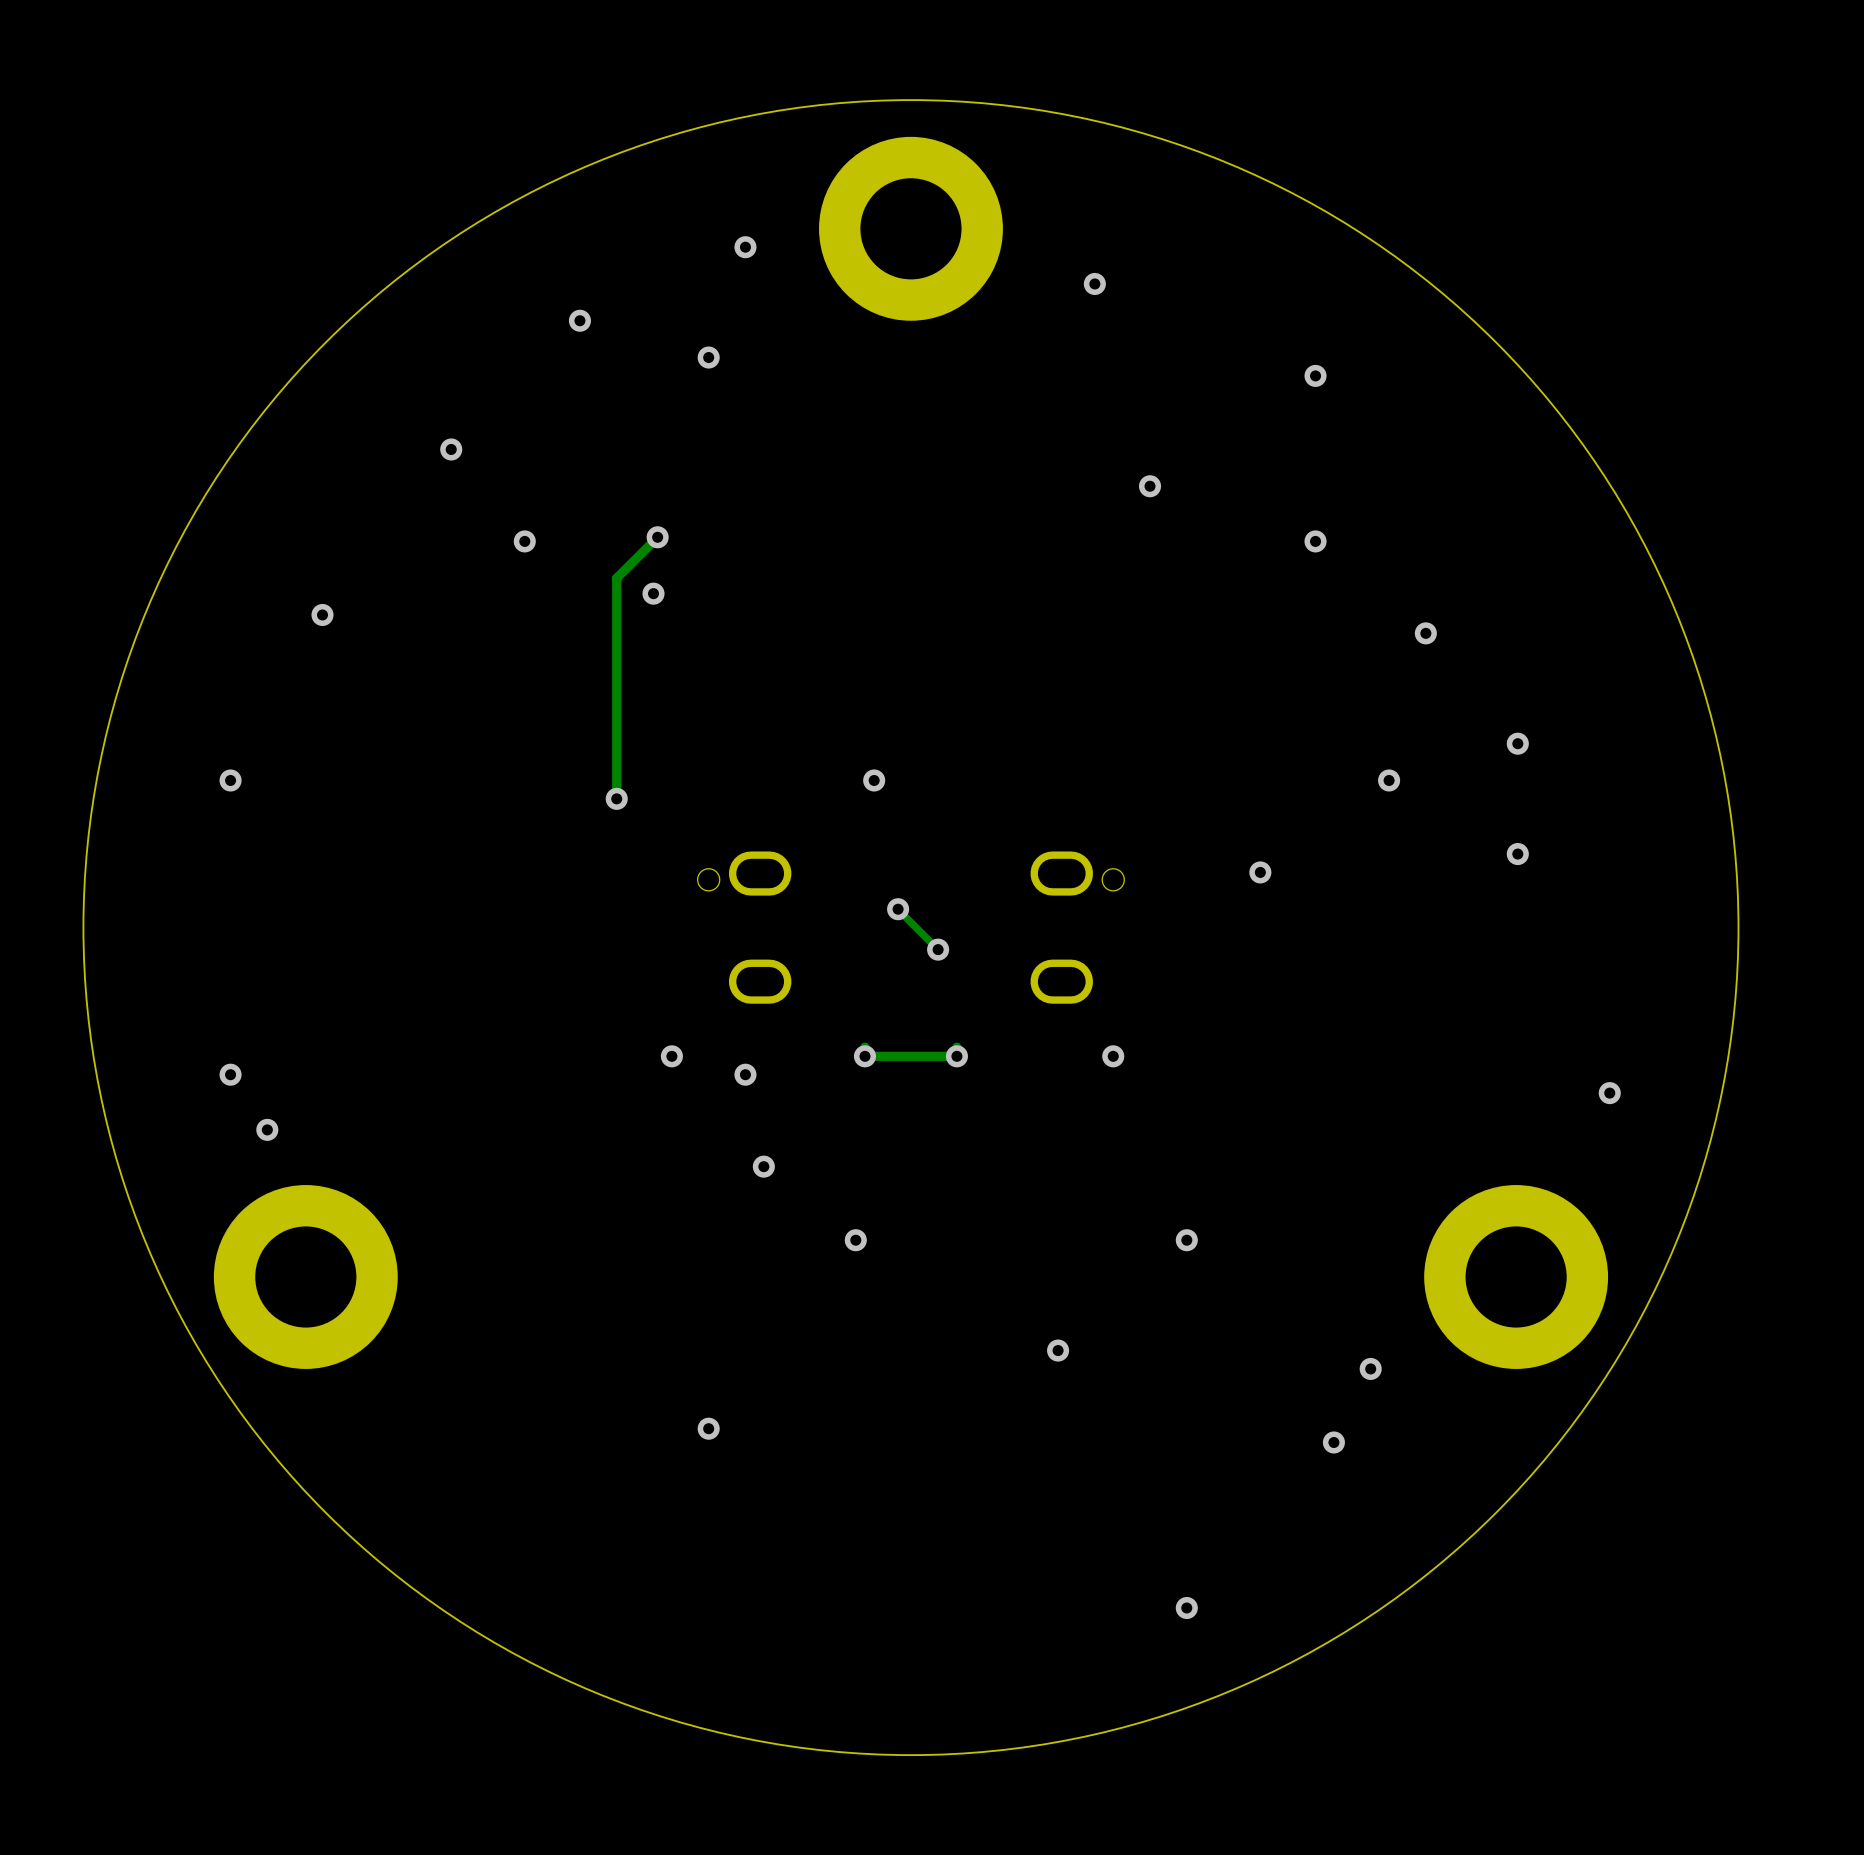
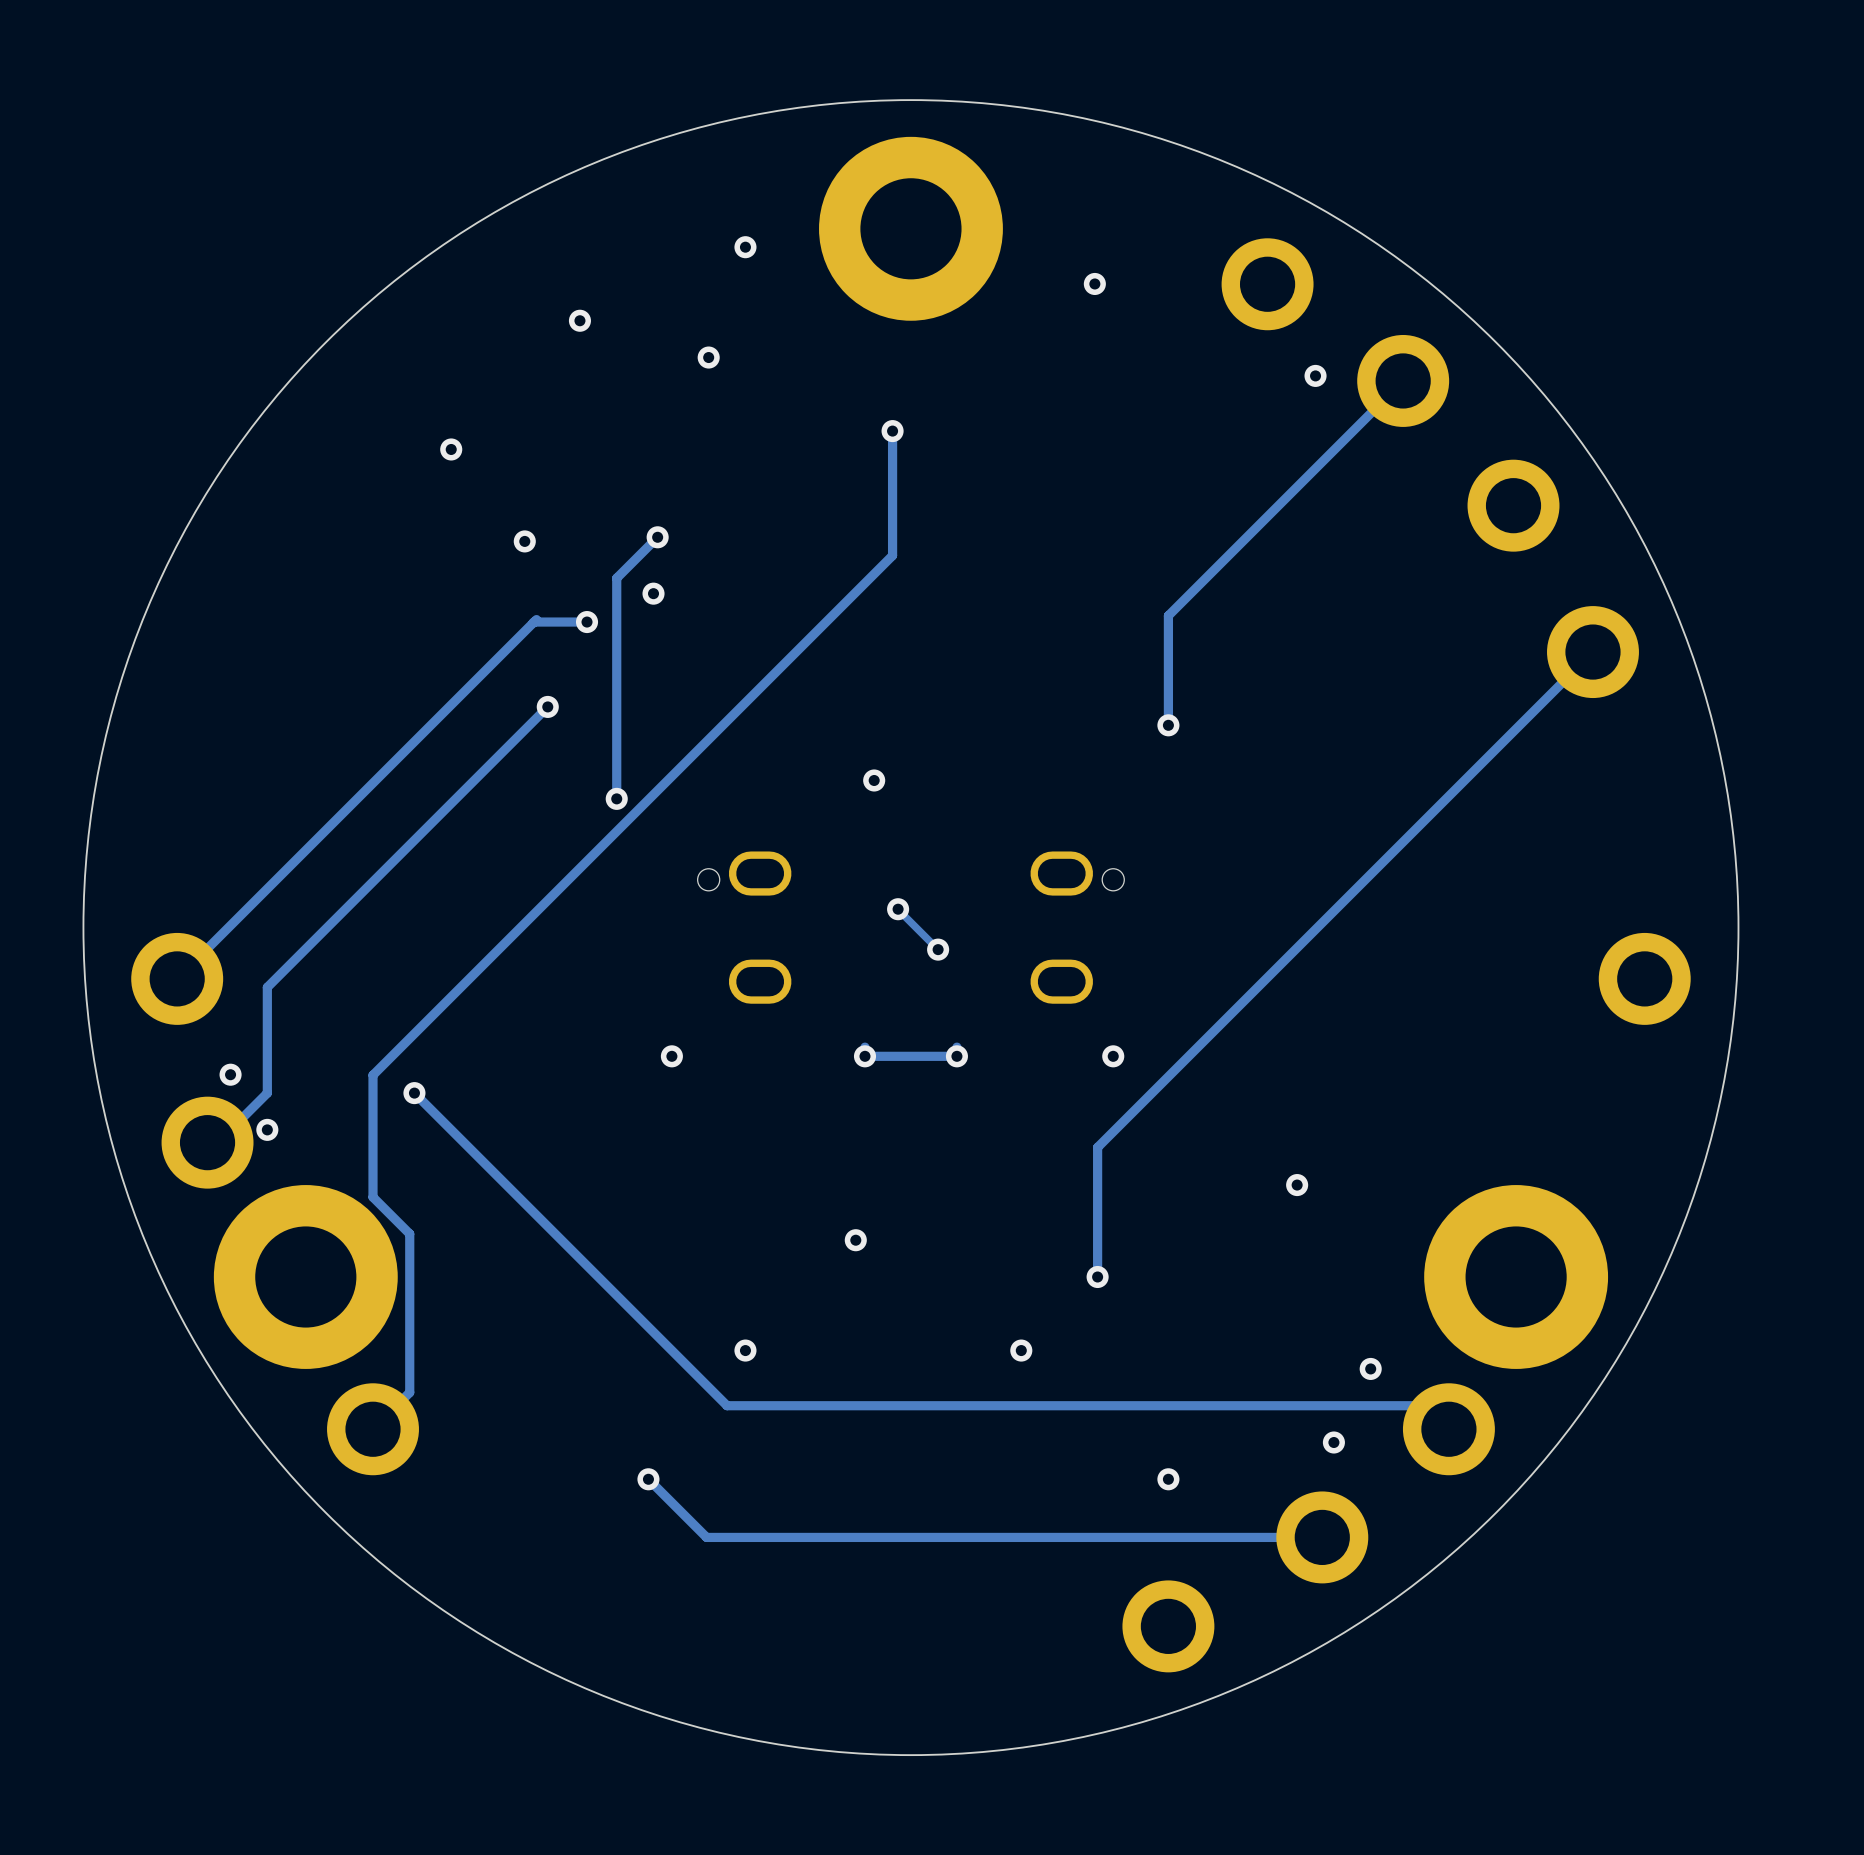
part: none -> (1267, 284)
track: none -> (1403, 380) (1168, 615) (1168, 725)
part: none -> (1403, 380)
track: none -> (892, 431) (892, 555) (373, 1075) (373, 1197) (409, 1233) (409, 1392) (373, 1429)
via: none -> (892, 431)
via: (1150, 486) -> none
part: none -> (1513, 505)
via: (1315, 541) -> none
via: (322, 614) -> none
track: none -> (536, 619) (177, 978)
track: none -> (587, 622) (534, 622)
via: none -> (587, 622)
via: (1425, 633) -> none
track: none -> (1592, 652) (1097, 1147) (1097, 1276)
part: none -> (1592, 652)
track: none -> (547, 706) (267, 987) (267, 1093) (217, 1142) (207, 1142)
via: none -> (547, 706)
via: none -> (1168, 725)
via: (1517, 743) -> none
via: (230, 780) -> none
via: (1389, 780) -> none
via: (1517, 854) -> none
via: (1260, 872) -> none
part: none -> (177, 978)
part: none -> (1644, 978)
via: (745, 1074) -> none
track: none -> (414, 1093) (727, 1405) (1425, 1405) (1448, 1429)
via: none -> (414, 1093)
via: (1609, 1093) -> none
part: none -> (207, 1142)
via: (763, 1166) -> none
via: none -> (1297, 1185)
via: (1186, 1240) -> none
via: none -> (1097, 1276)
via: none -> (745, 1350)
via position: (1058, 1350) -> (1021, 1350)
via: (708, 1428) -> none
part: none -> (373, 1429)
part: none -> (1448, 1429)
track: none -> (648, 1479) (706, 1537) (1322, 1537)
via: none -> (648, 1479)
via: none -> (1168, 1479)
part: none -> (1322, 1537)
via: (1186, 1608) -> none
part: none -> (1168, 1626)

